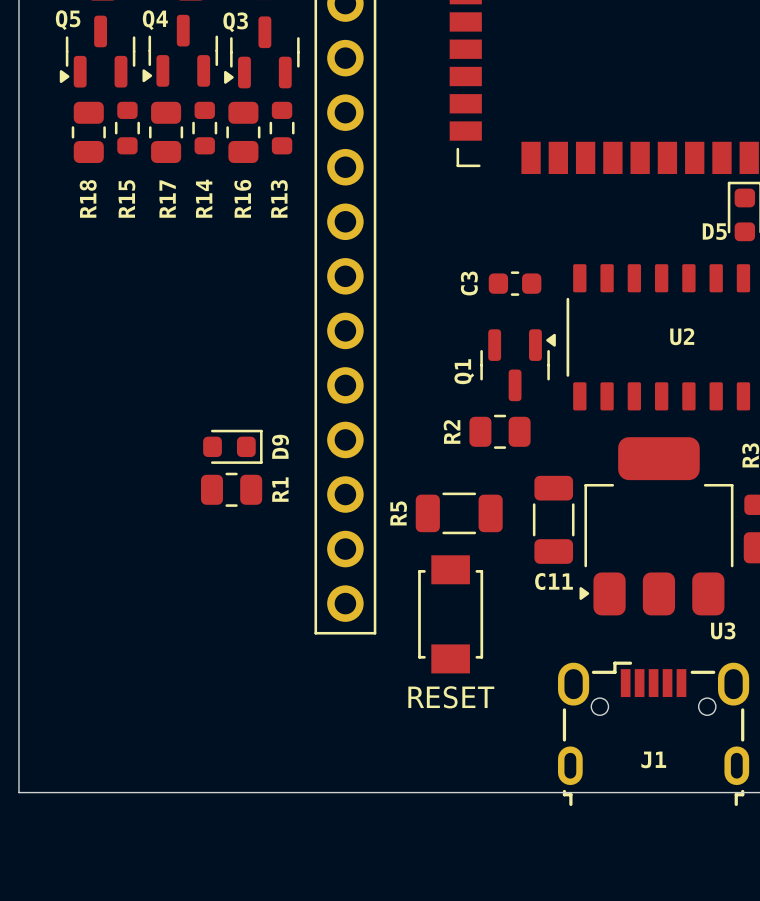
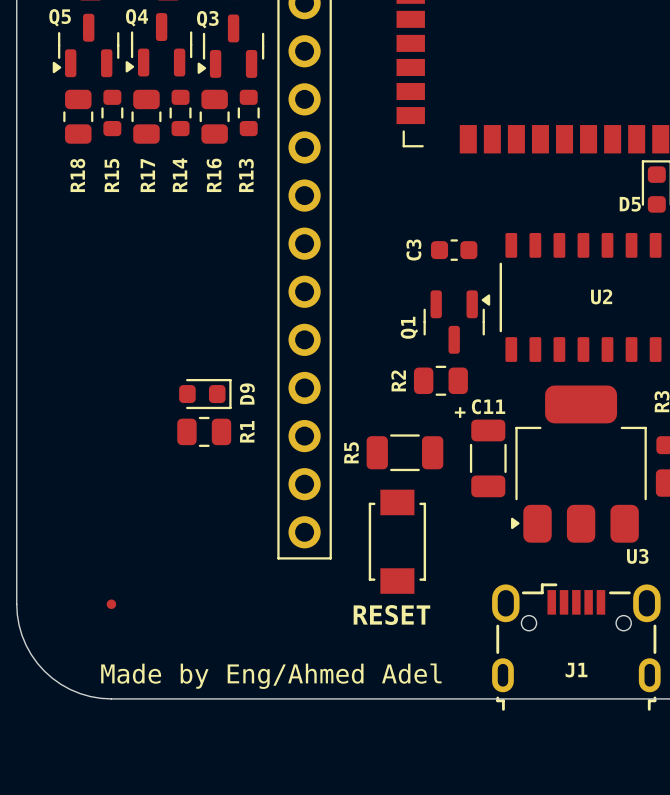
text: none -> + (460, 412)
C11 name position: C11 (554, 581) -> C11 (488, 406)
board edge: (18, 685) (18, 792) (126, 792) -> (16, 604) (22, 635) (31, 654) (44, 671) (61, 684) (80, 693) (111, 698)
part: none -> (111, 604)
text: none -> RESET (391, 615)
RESET name: RESET (451, 697) -> none
text: none -> Made by Eng/Ahmed Adel (271, 676)

